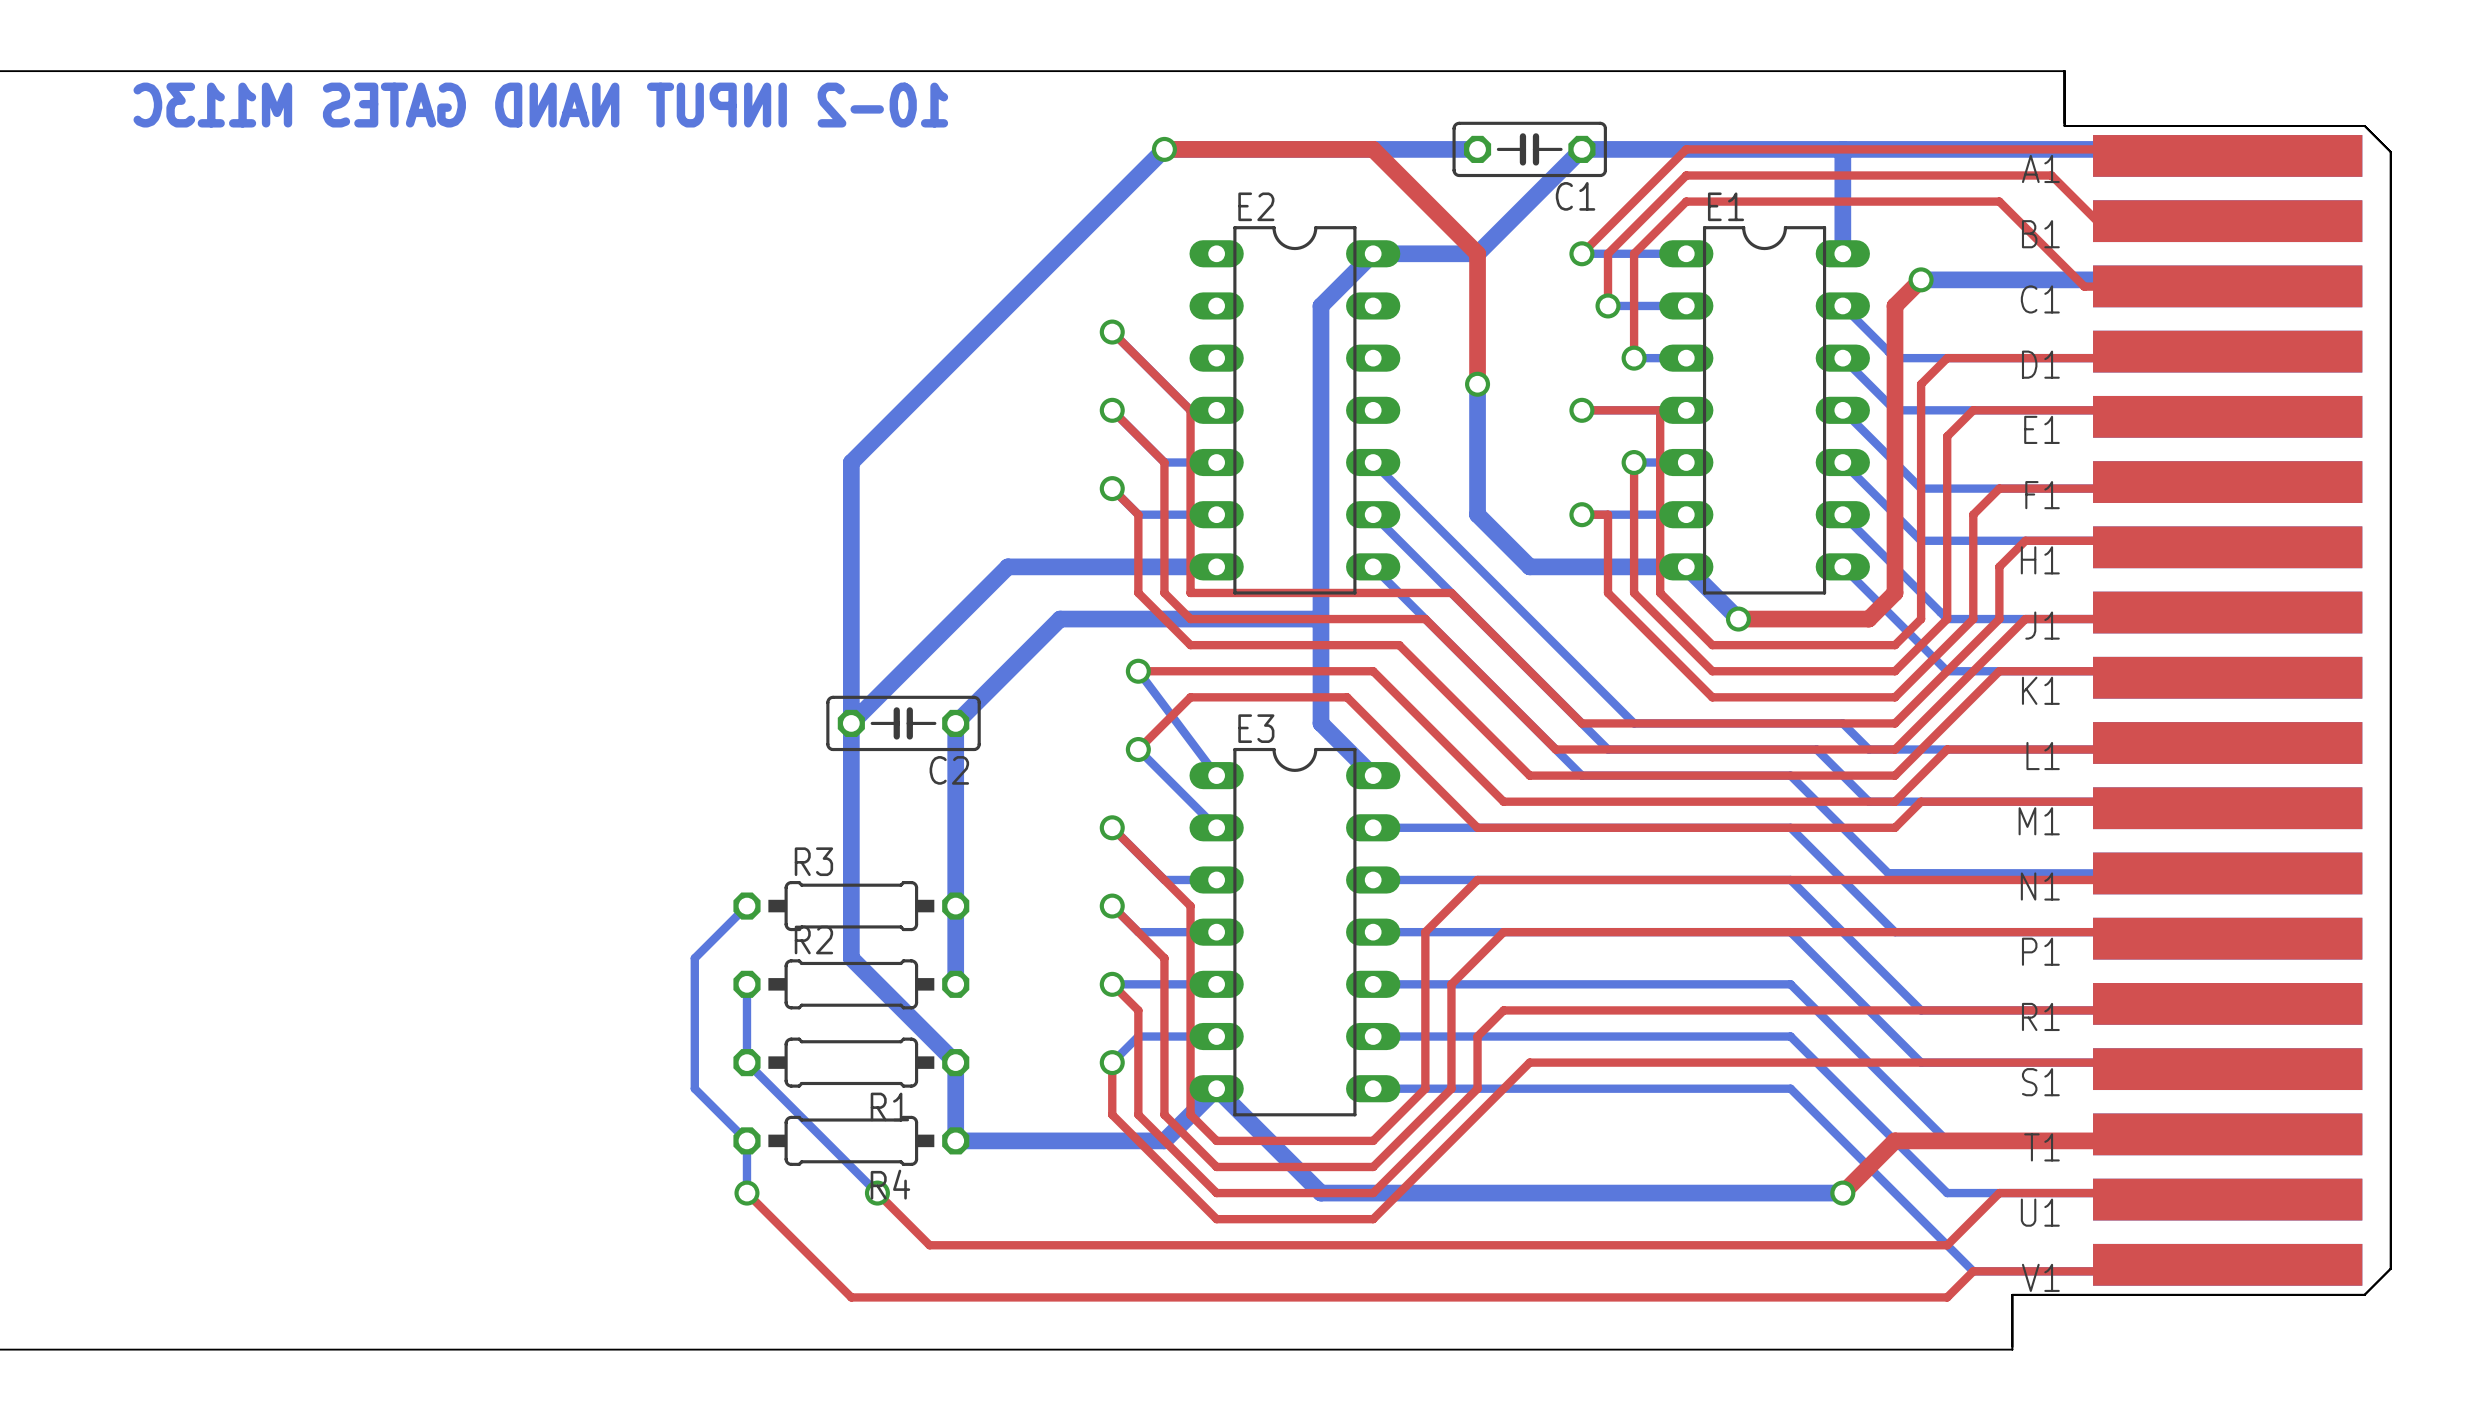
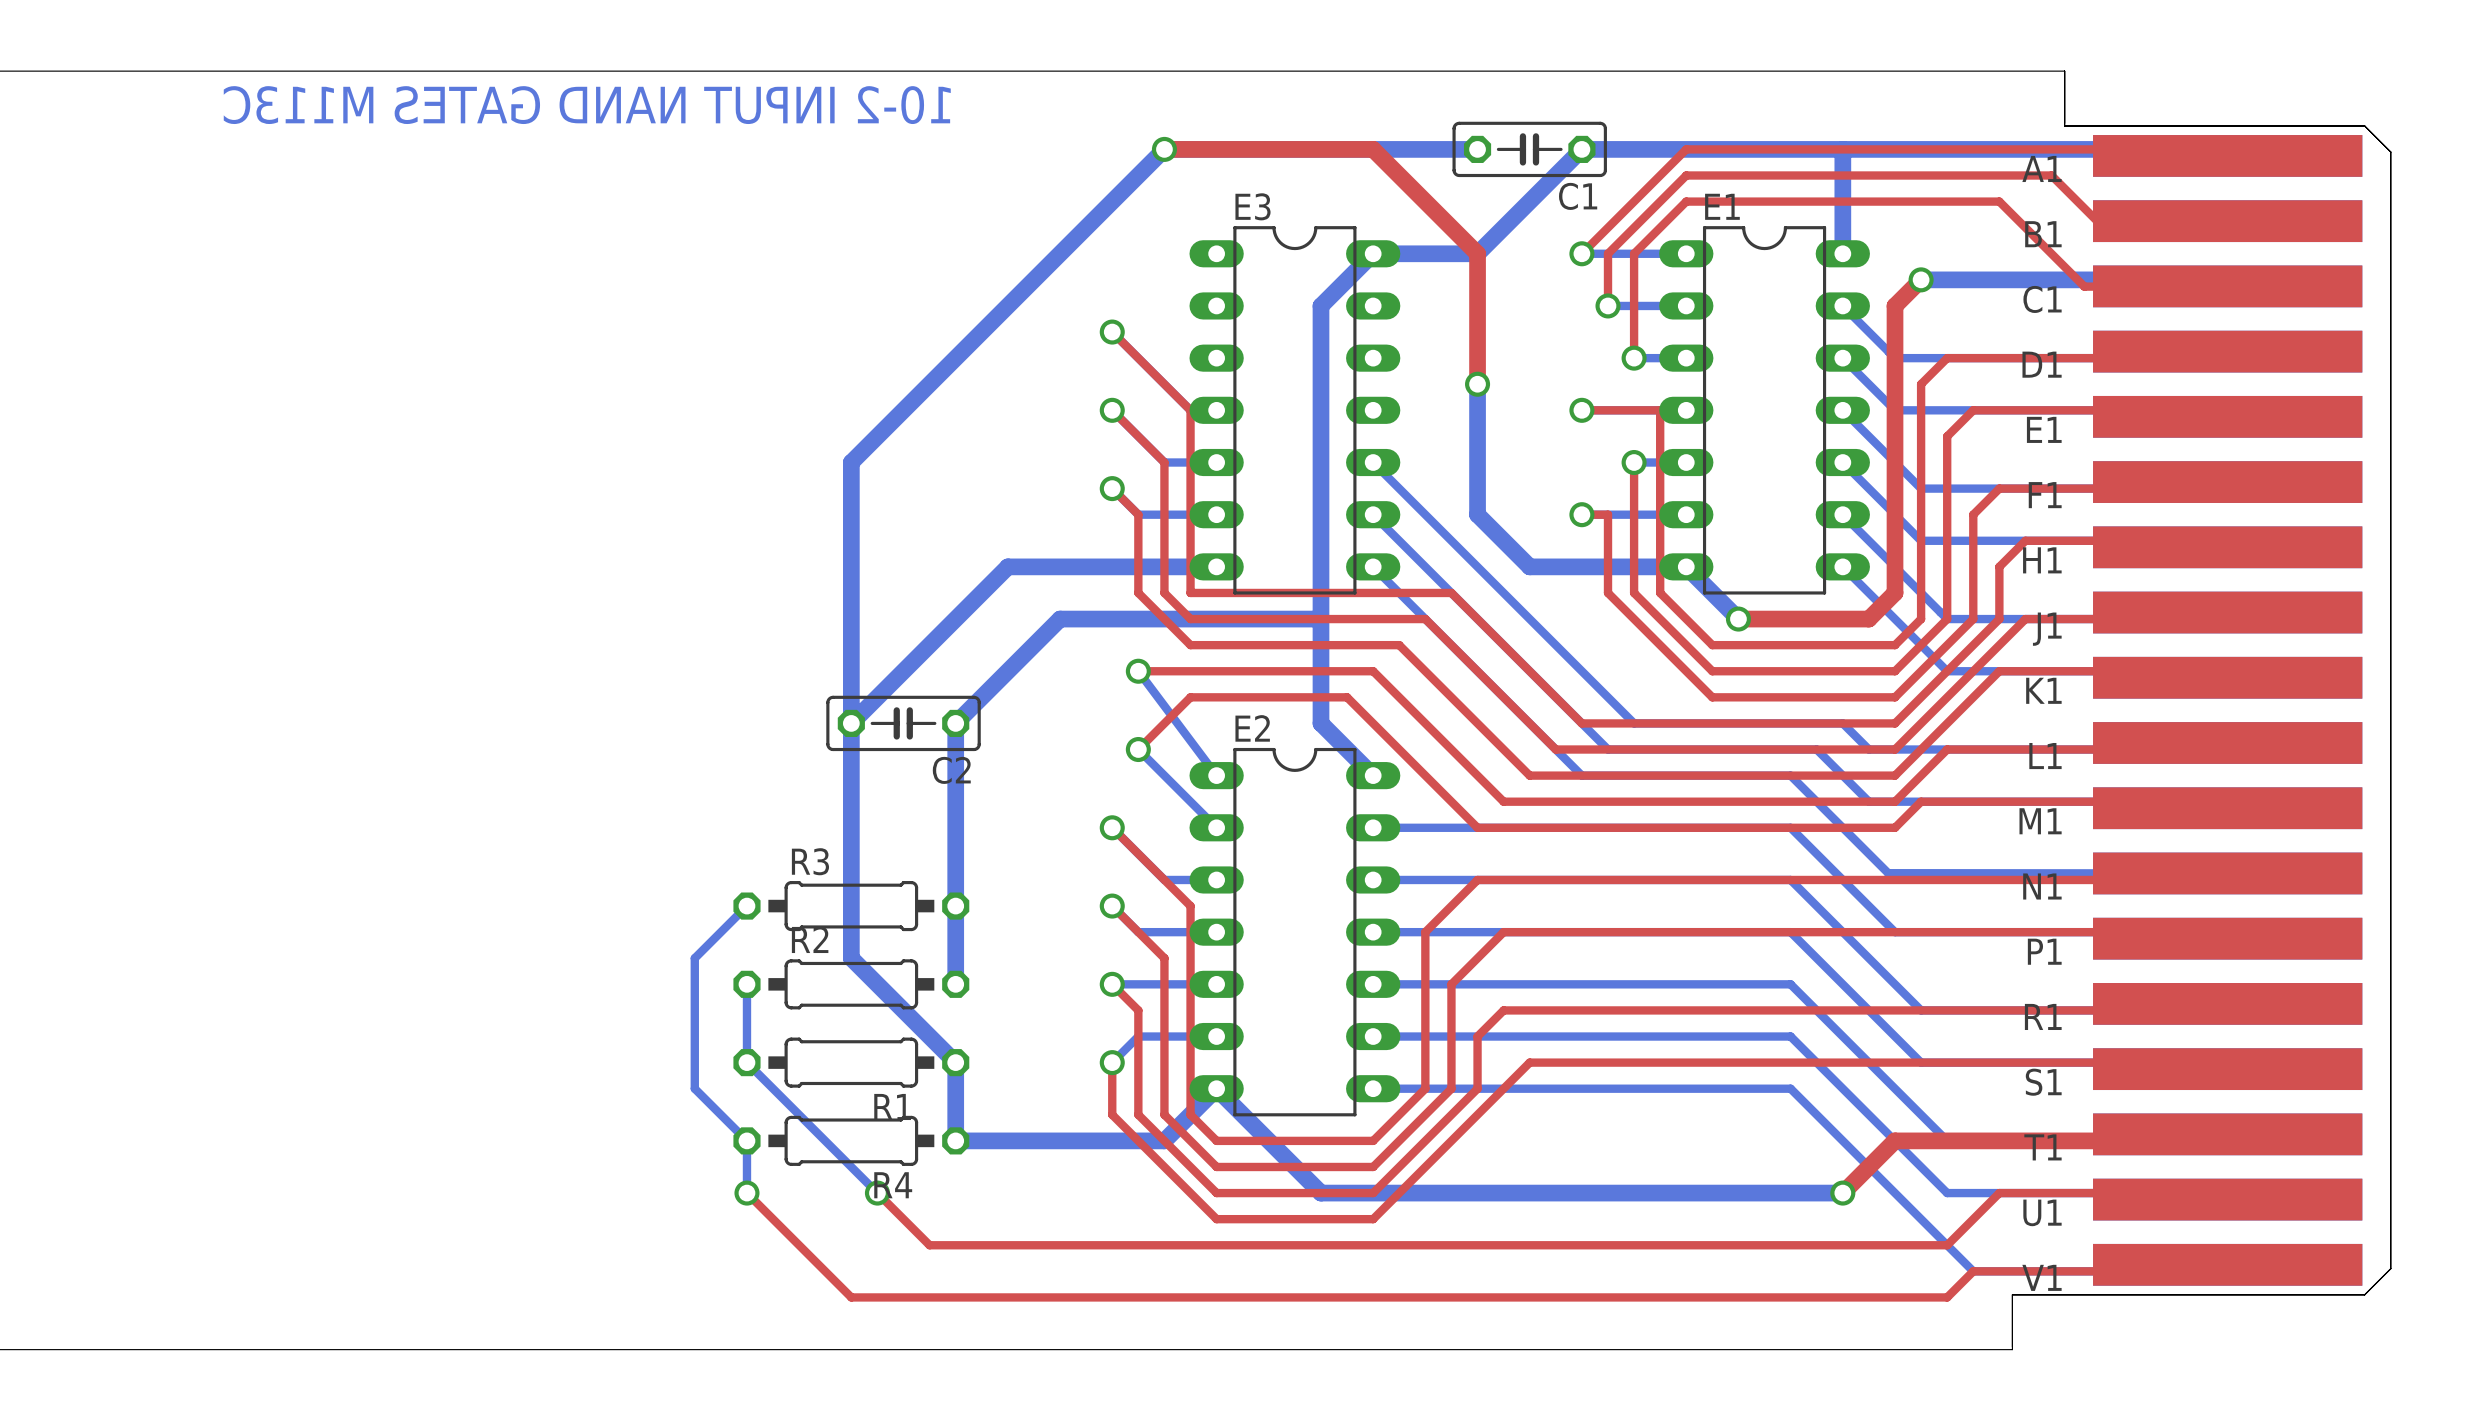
E2 name: E2 (1256, 206) -> E3 (1252, 206)
E3 name: E3 (1256, 728) -> E2 (1252, 728)

